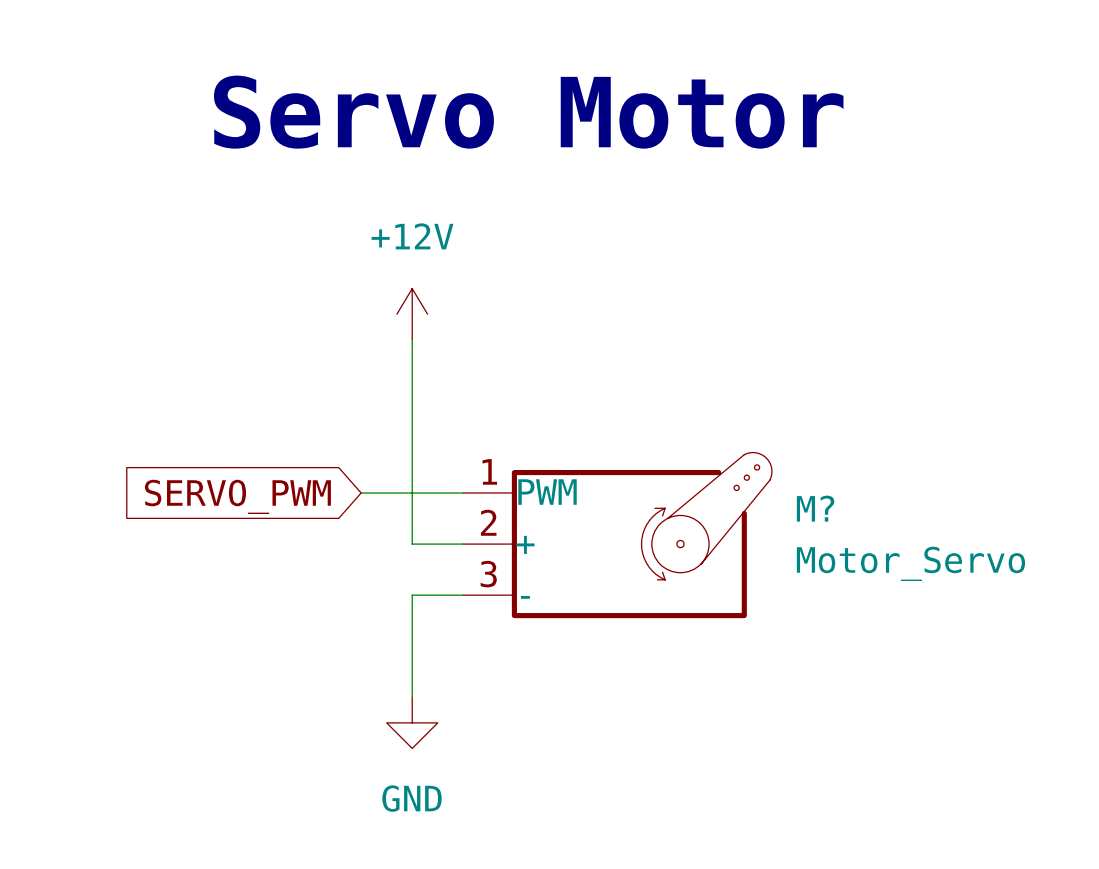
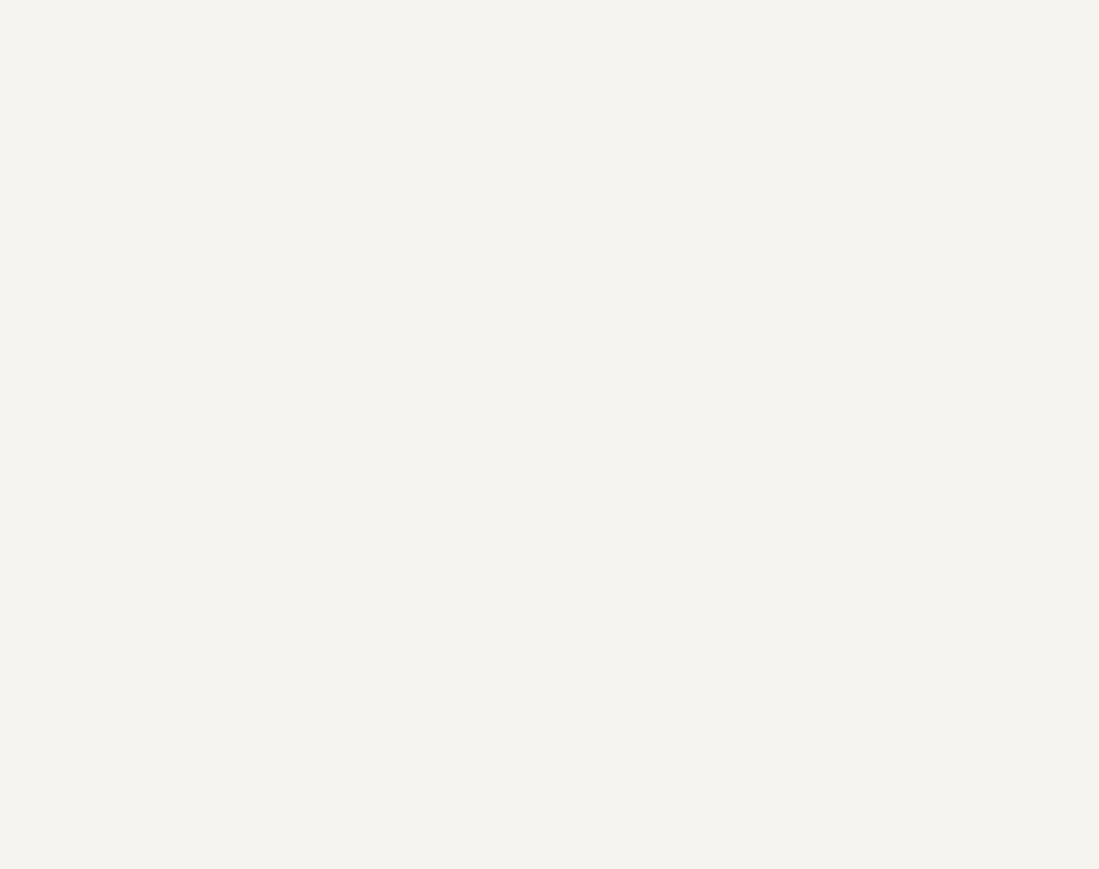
text: Servo Motor (528, 112) -> none
power symbol: +12V (412, 314) -> none
wire: (412, 339) (412, 544) (463, 544) -> none
wire: (361, 492) (463, 492) -> none
global label: SERVO_PWM (237, 496) -> none
M?: Motor_Servo (617, 535) -> none
wire: (463, 595) (412, 595) (412, 697) -> none
power symbol: GND (412, 722) -> none

